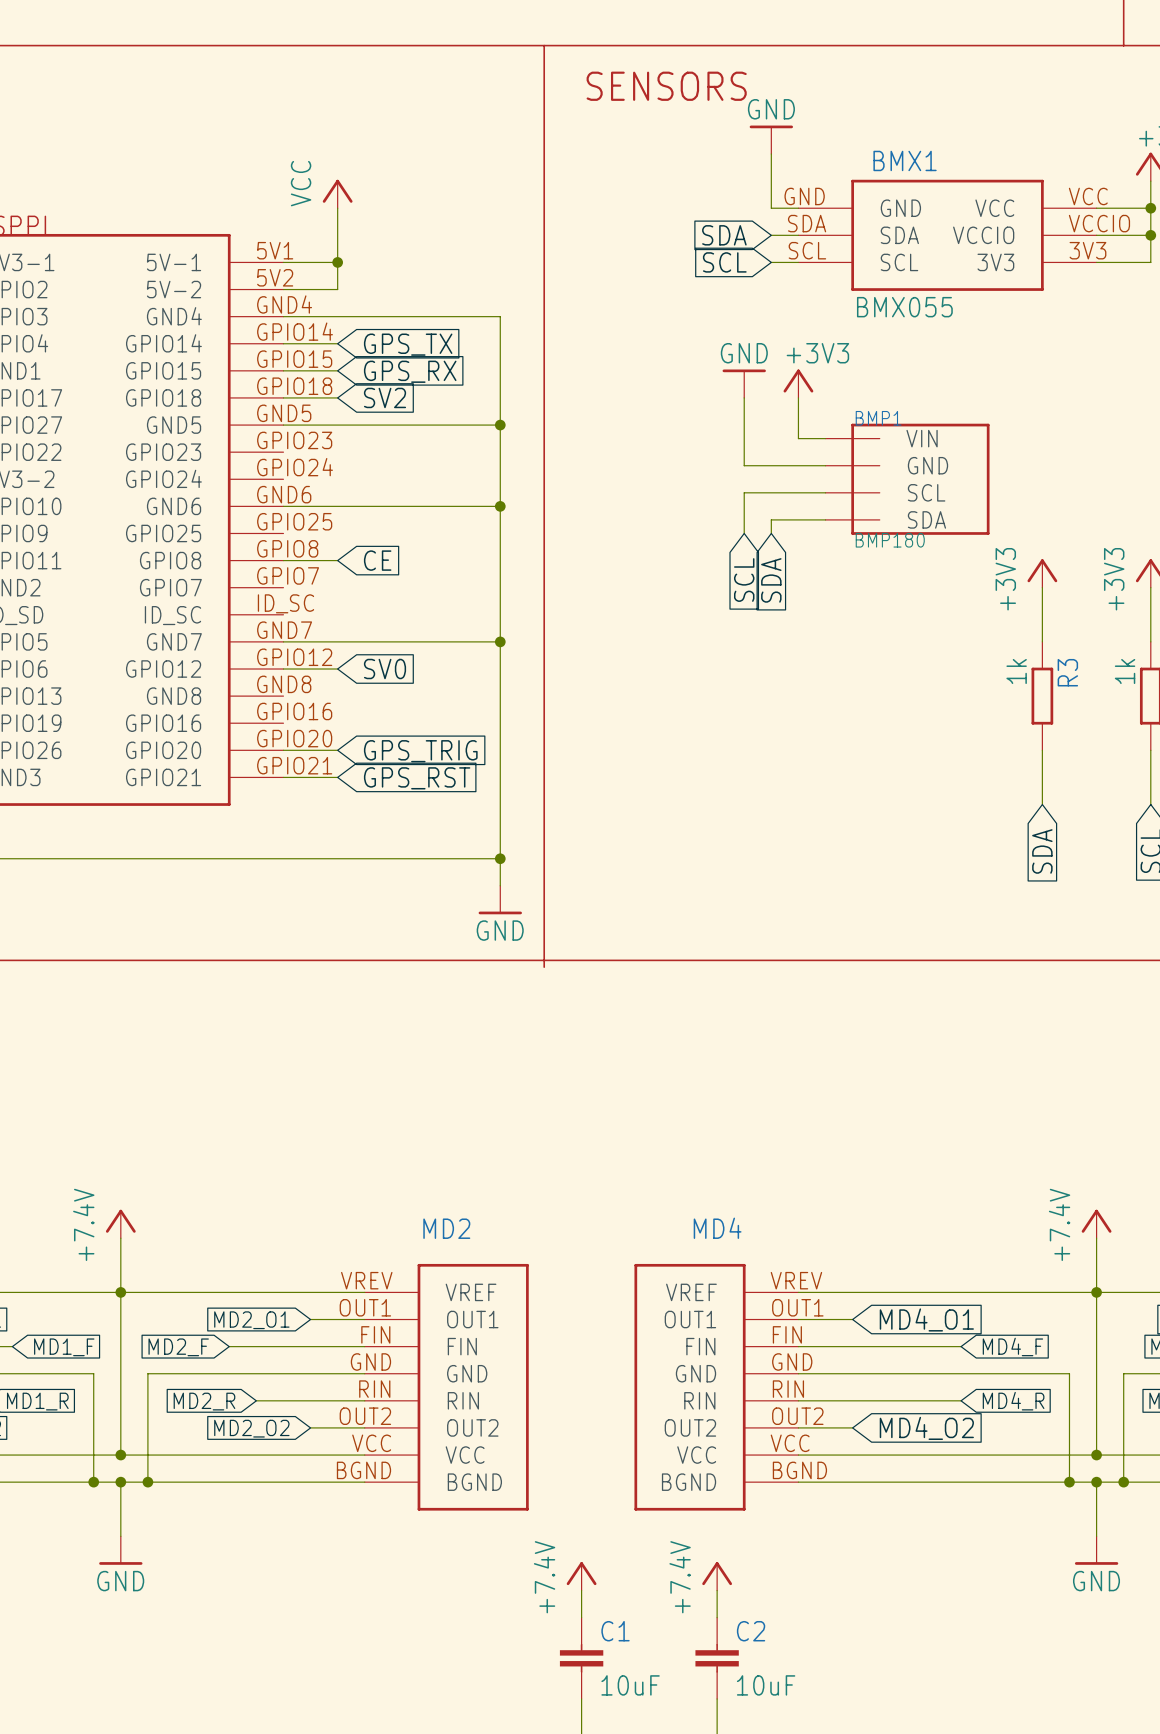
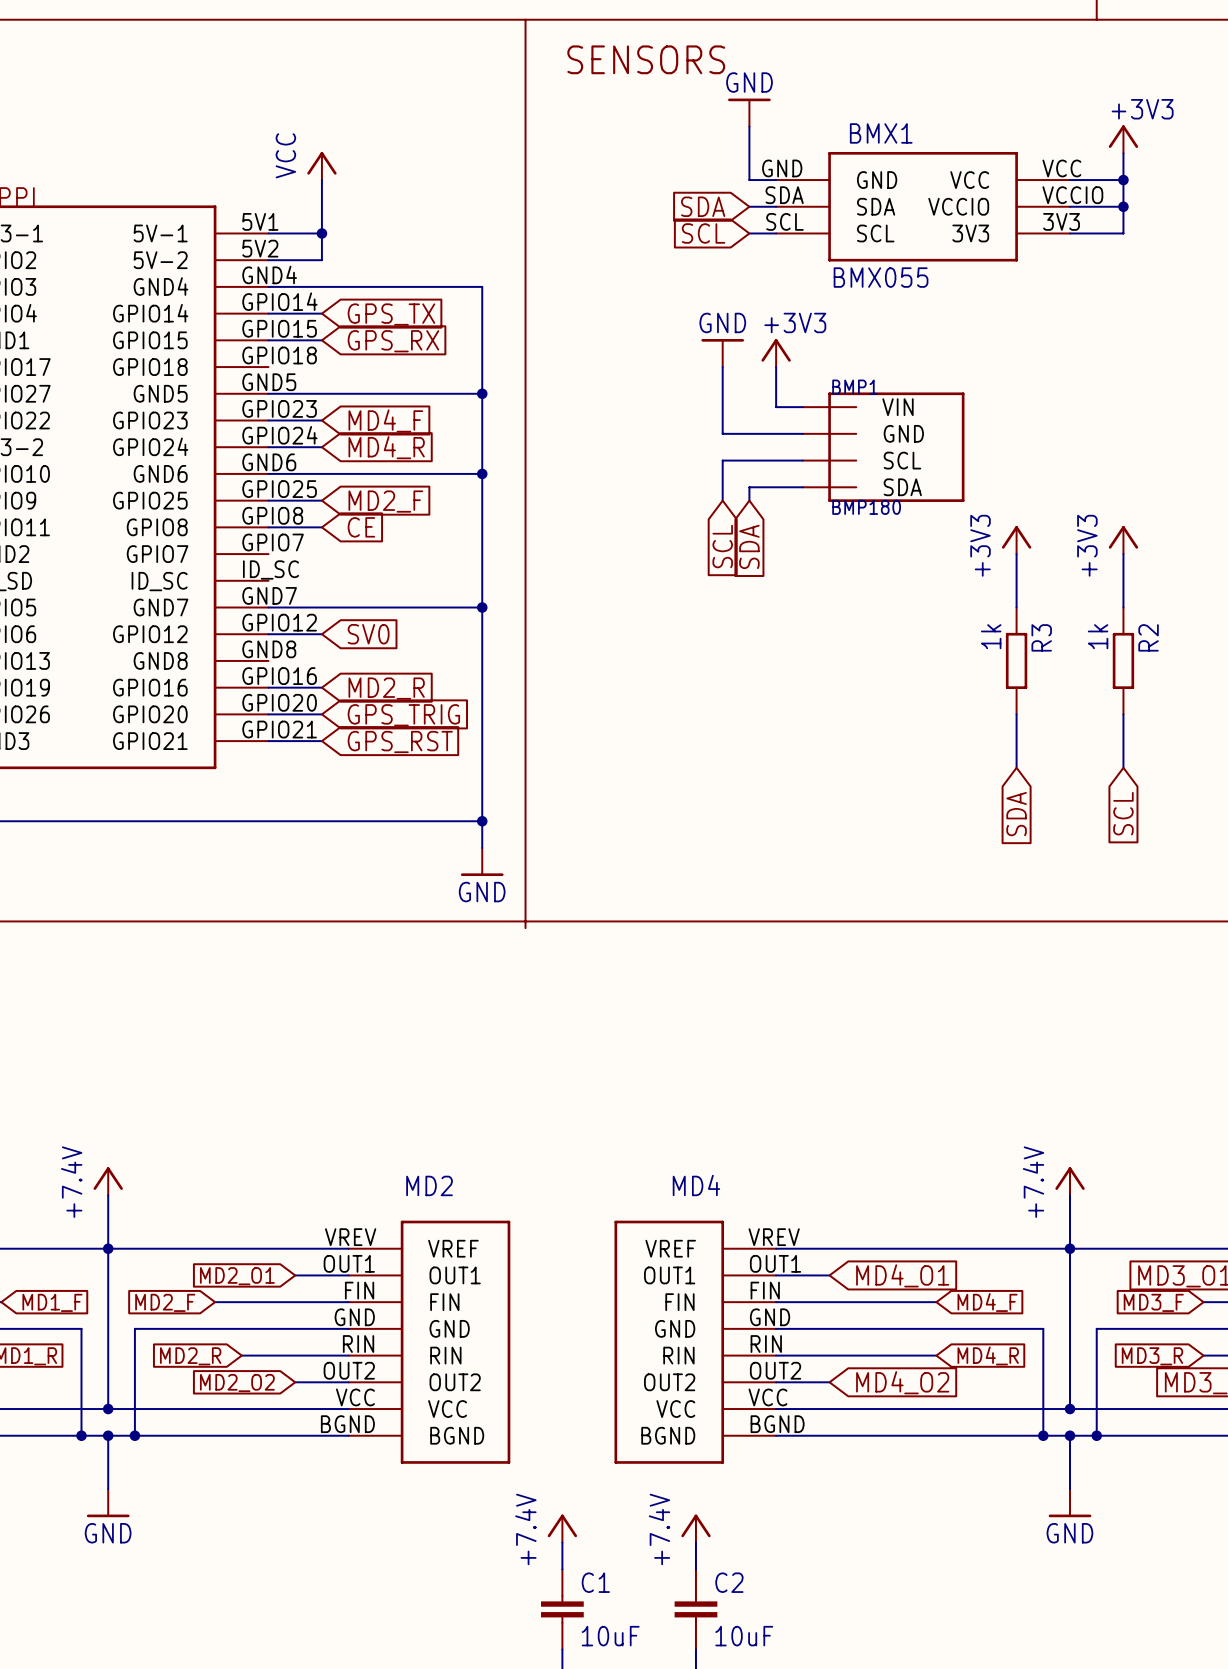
wire: (283, 397) (337, 397) -> (268, 420) (321, 420)
global label: SV2 (385, 397) -> none
global label: none -> MD4_F (385, 420)
wire: none -> (268, 447) (321, 447)
global label: none -> MD4_R (386, 447)
wire: none -> (268, 500) (321, 500)
global label: none -> MD2_F (385, 501)
wire: none -> (268, 687) (321, 687)
global label: none -> MD2_R (386, 688)

